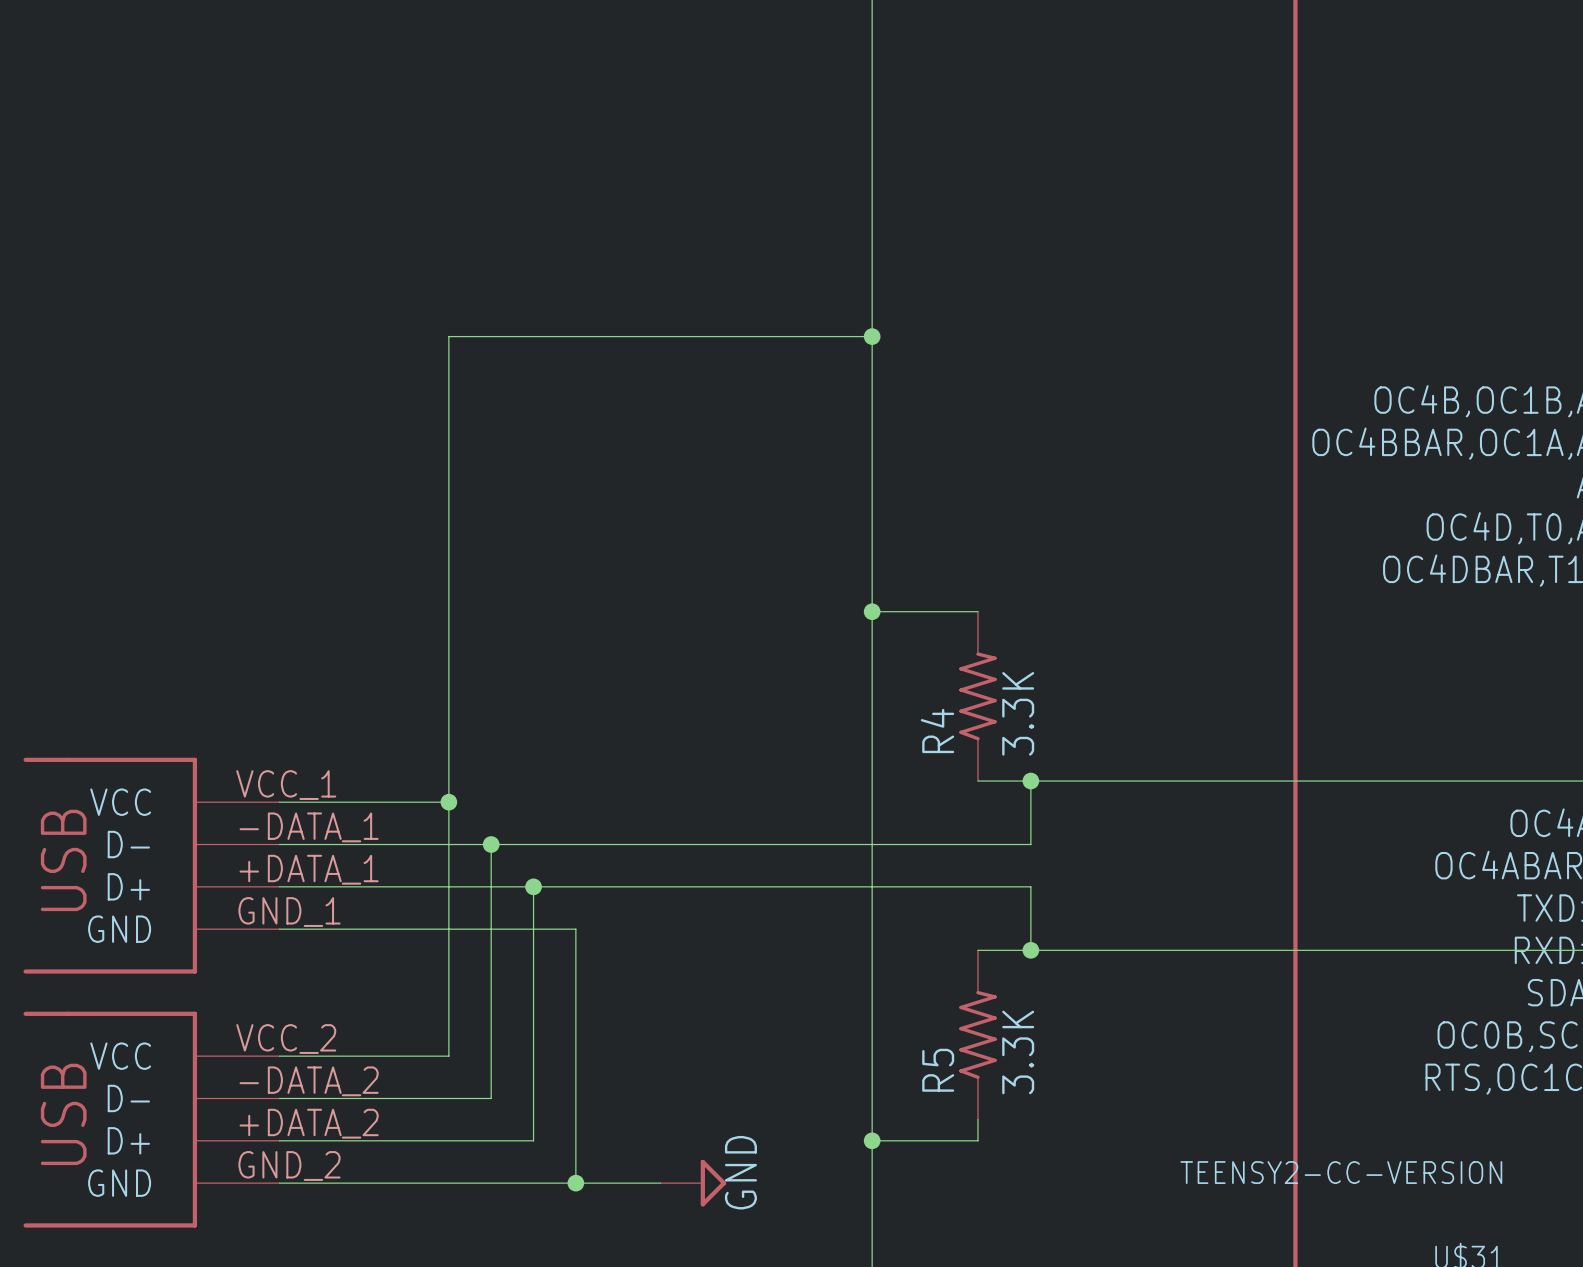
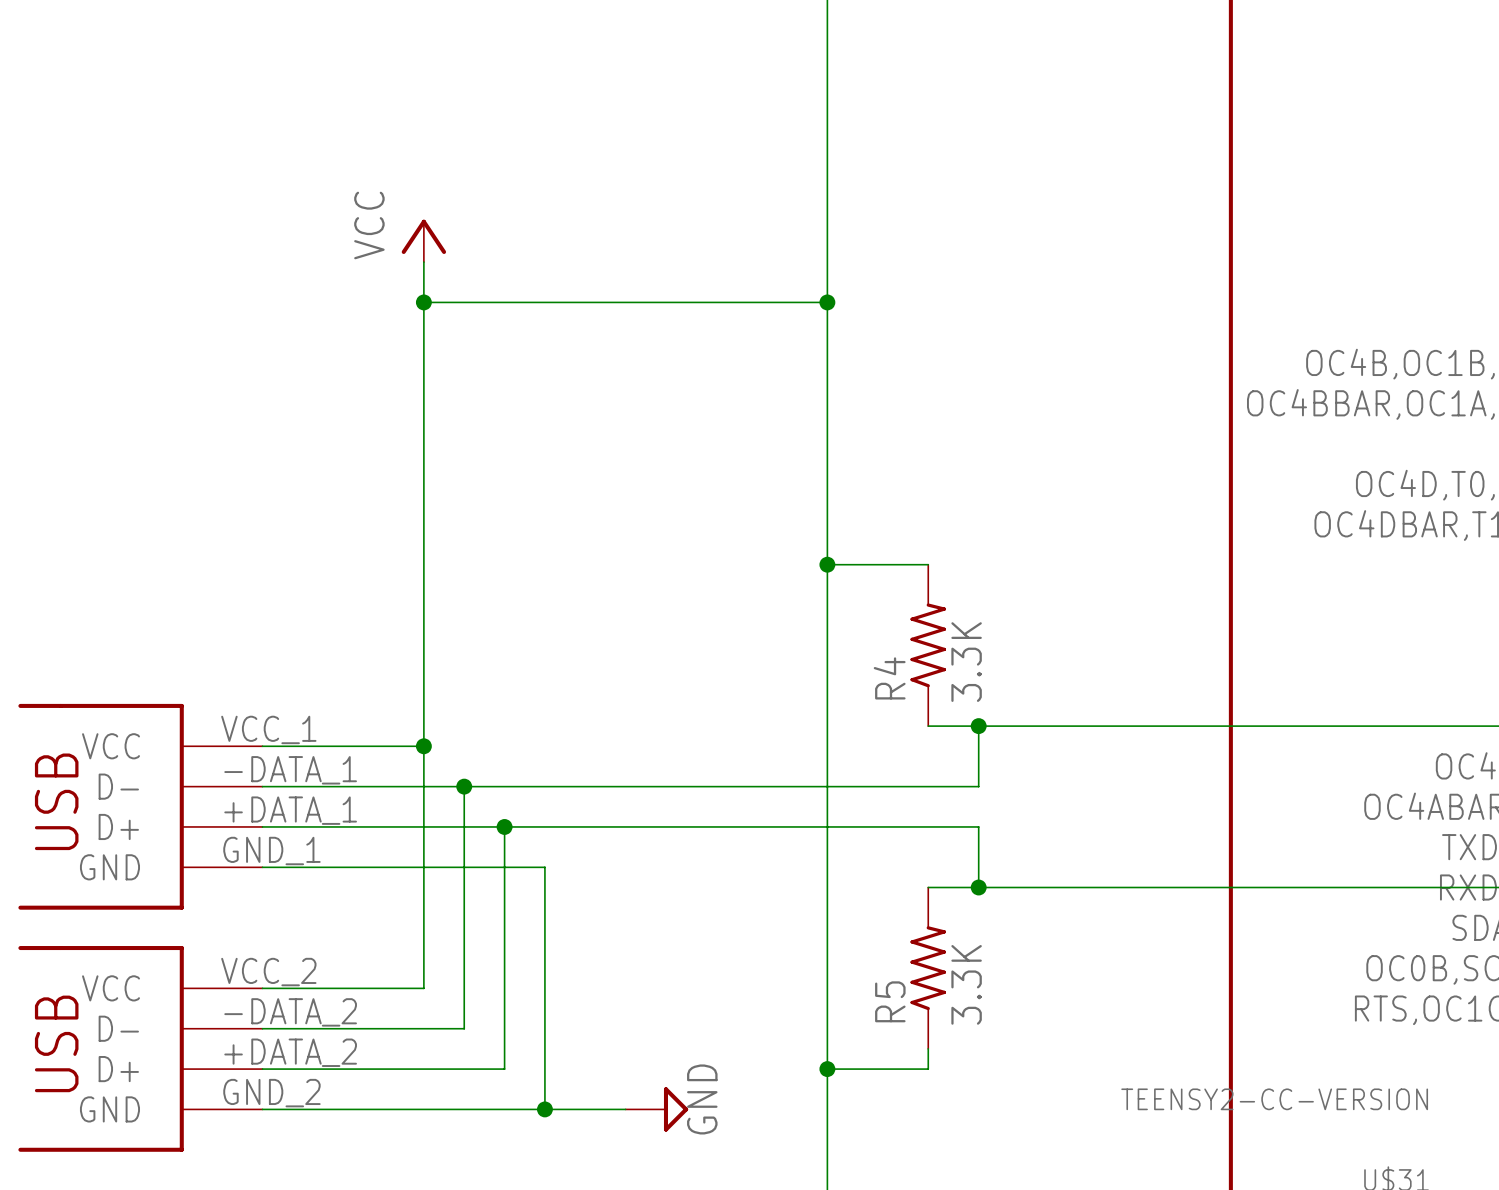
power symbol: none -> VCC (423, 240)
wire: none -> (423, 262) (423, 302)
junction: none -> (423, 302)

